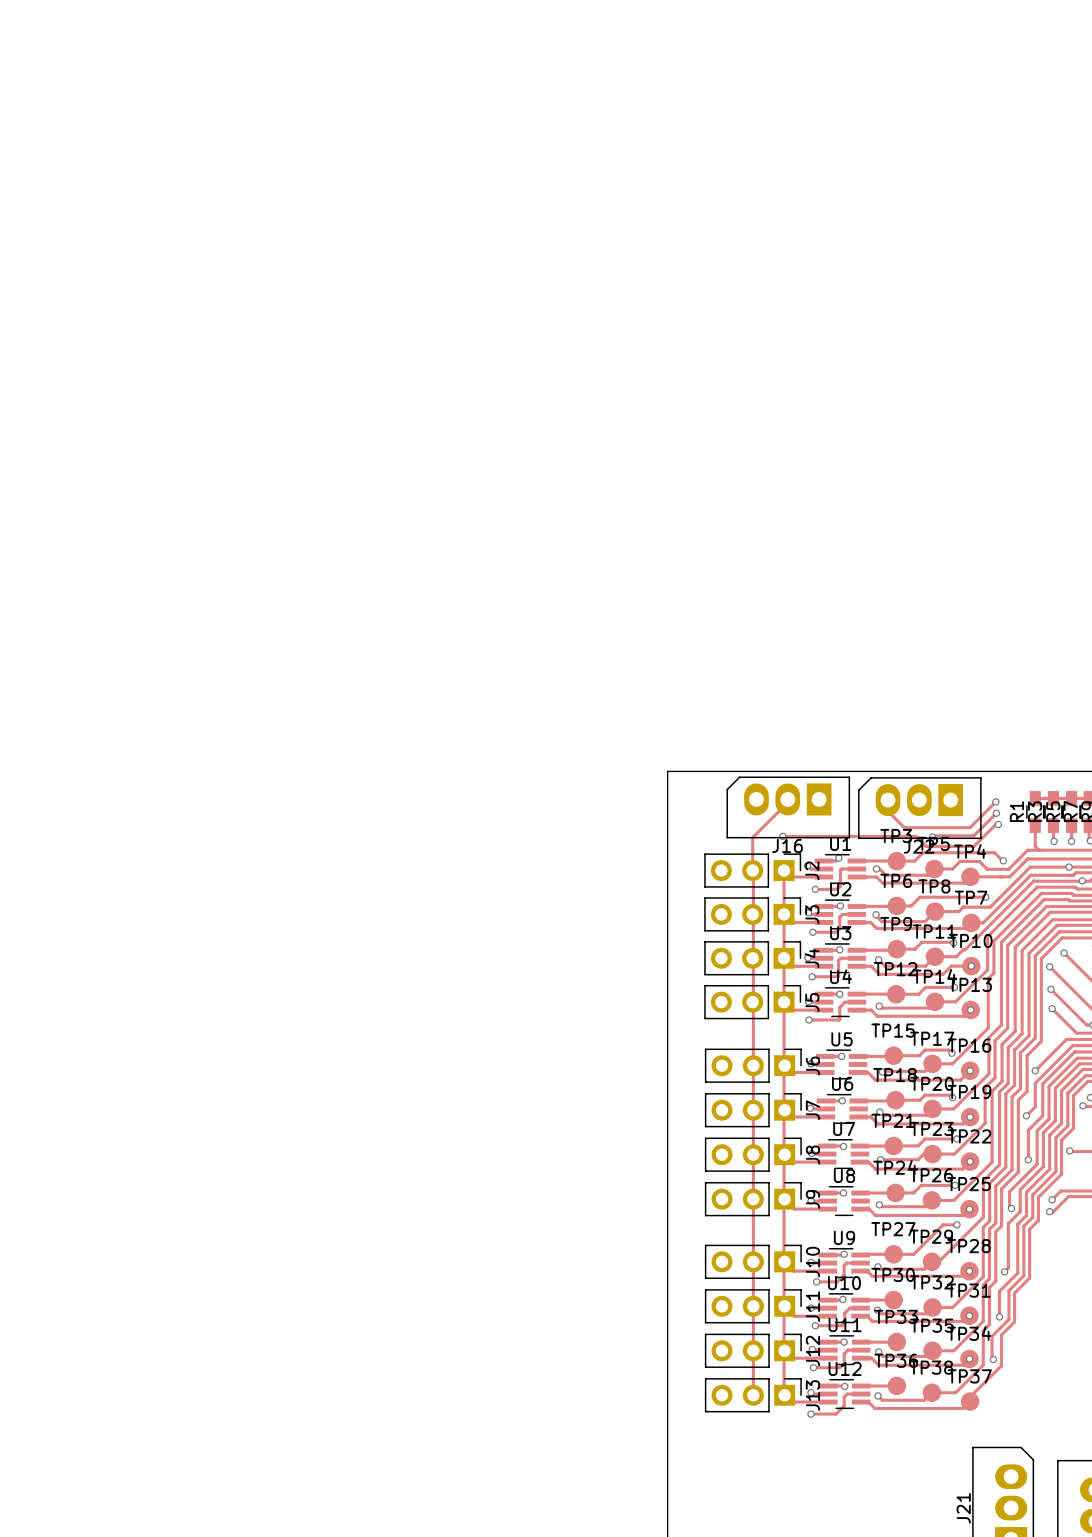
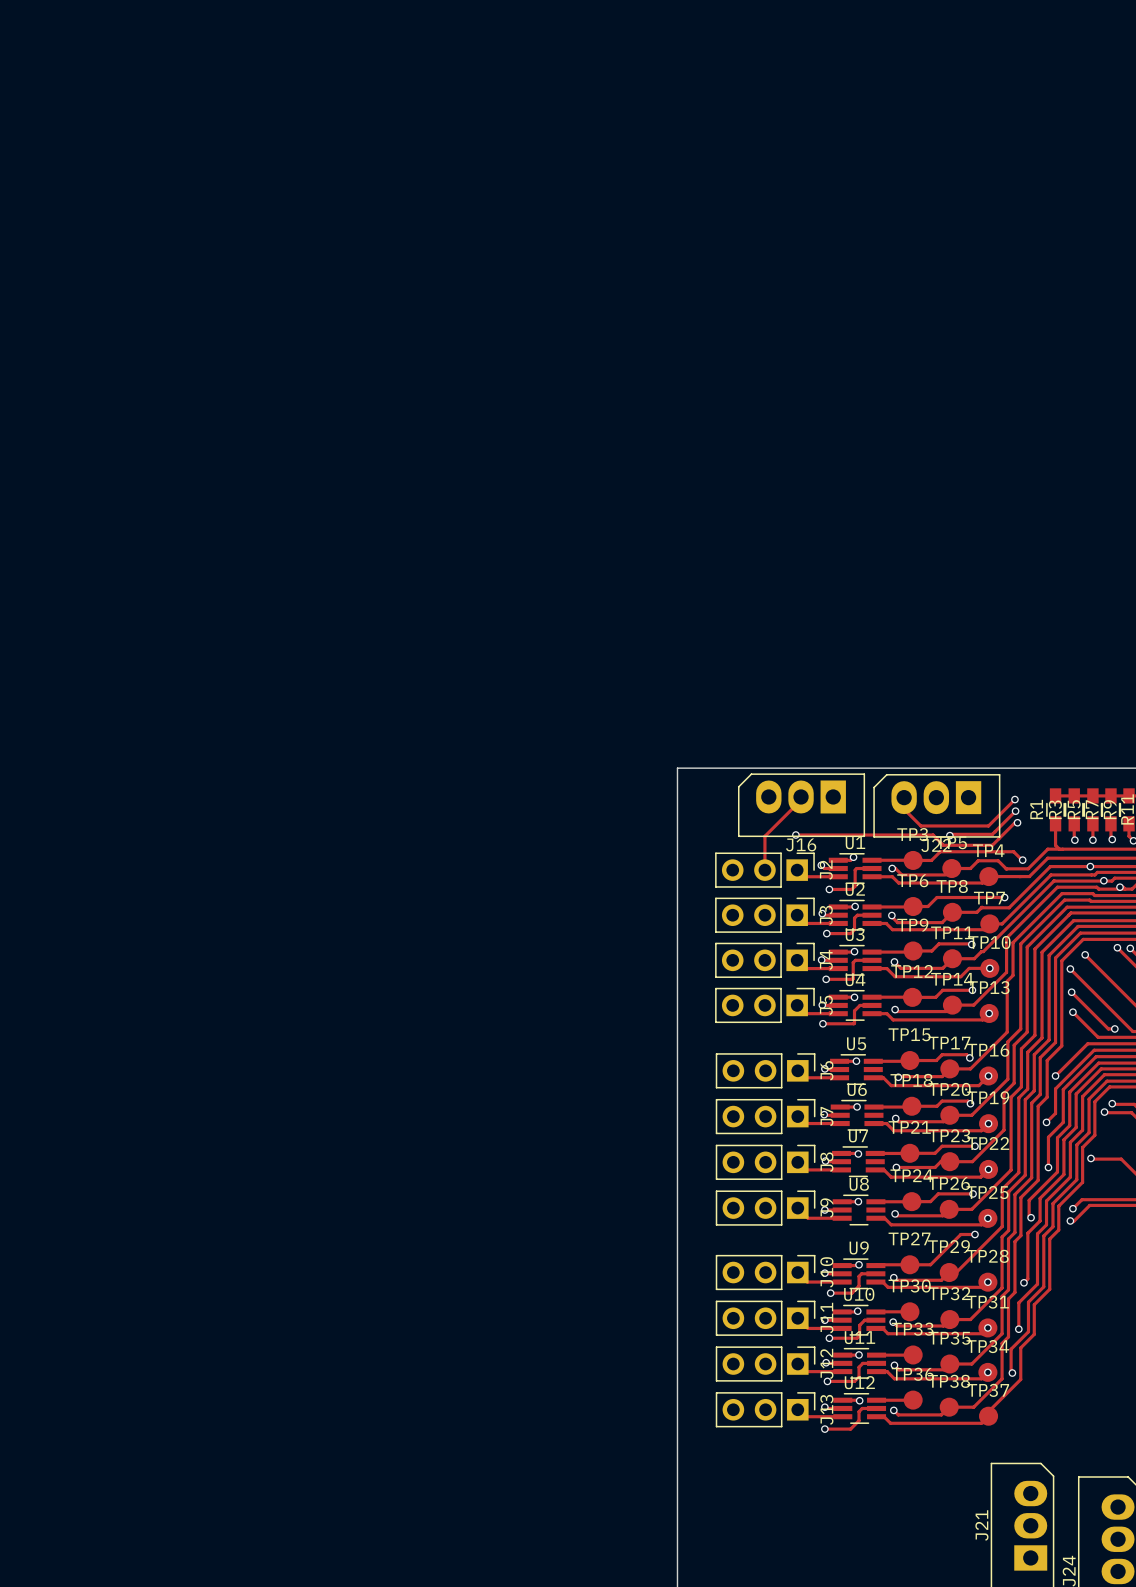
track: (752, 870) (753, 1395) -> none
track: (784, 870) (784, 1395) -> none

